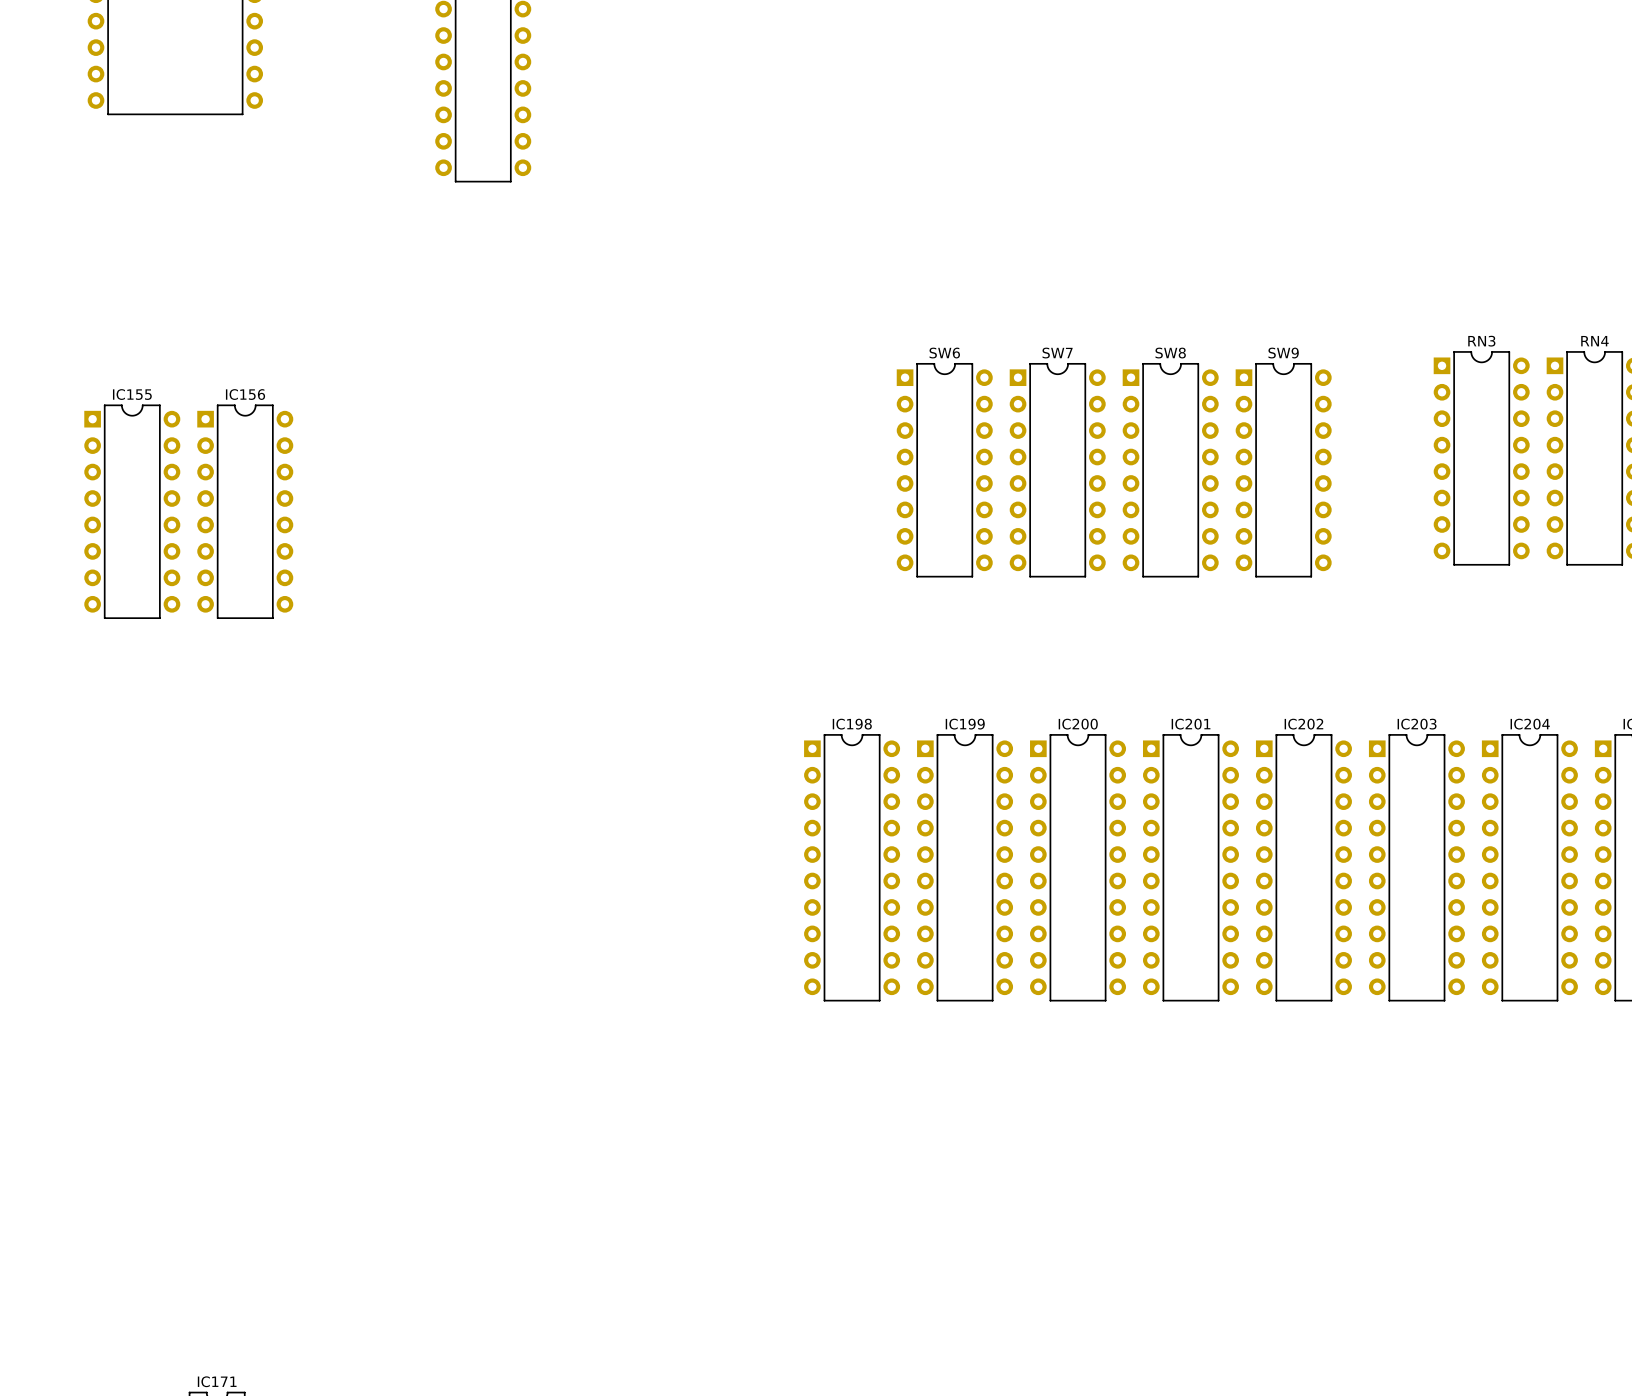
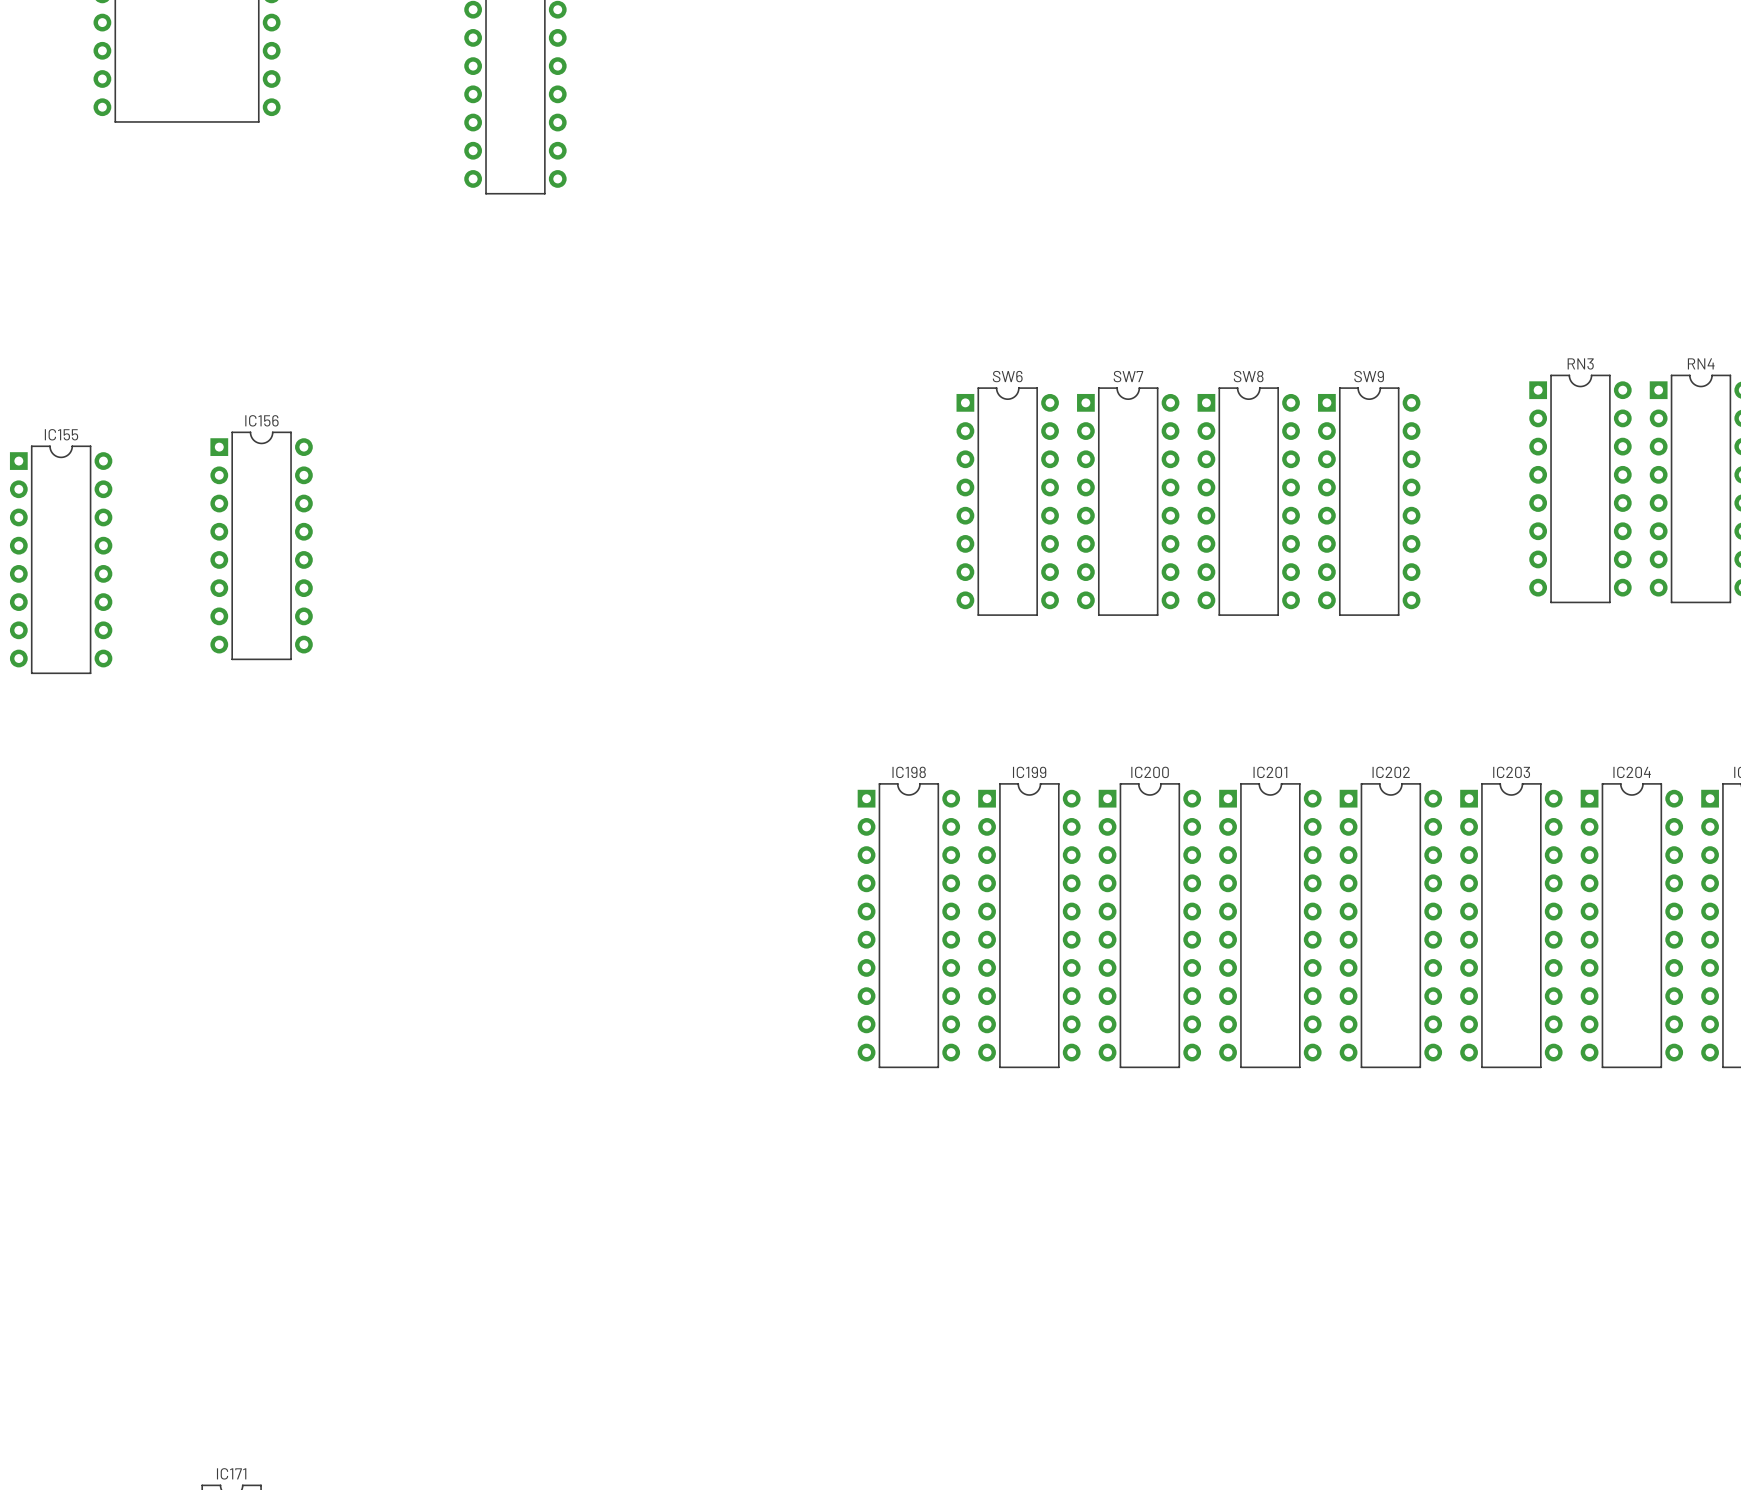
IC155 position: (132, 511) -> (61, 559)

